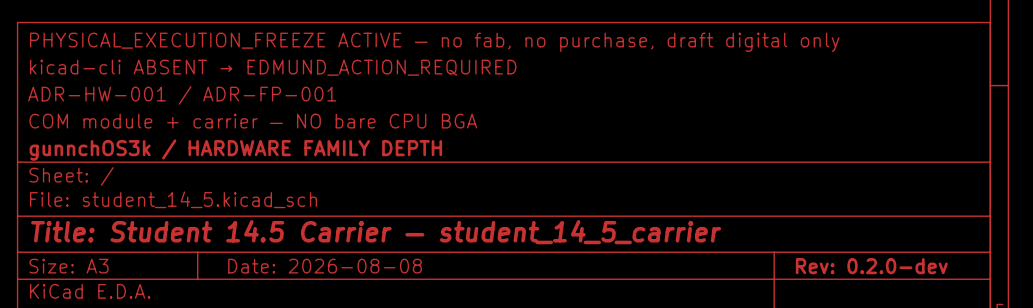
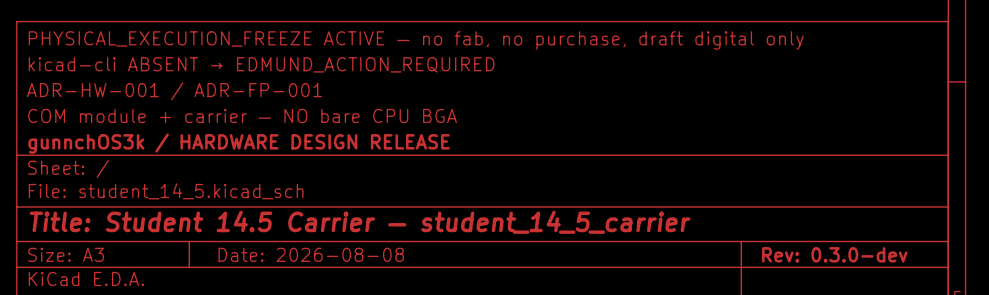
title block: gunnchOS3k / HARDWARE FAMILY DEPTH (235, 150) -> gunnchOS3k / HARDWARE DESIGN RELEASE (239, 143)
title block: Rev: 0.2.0-dev (871, 266) -> Rev: 0.3.0-dev (834, 254)

